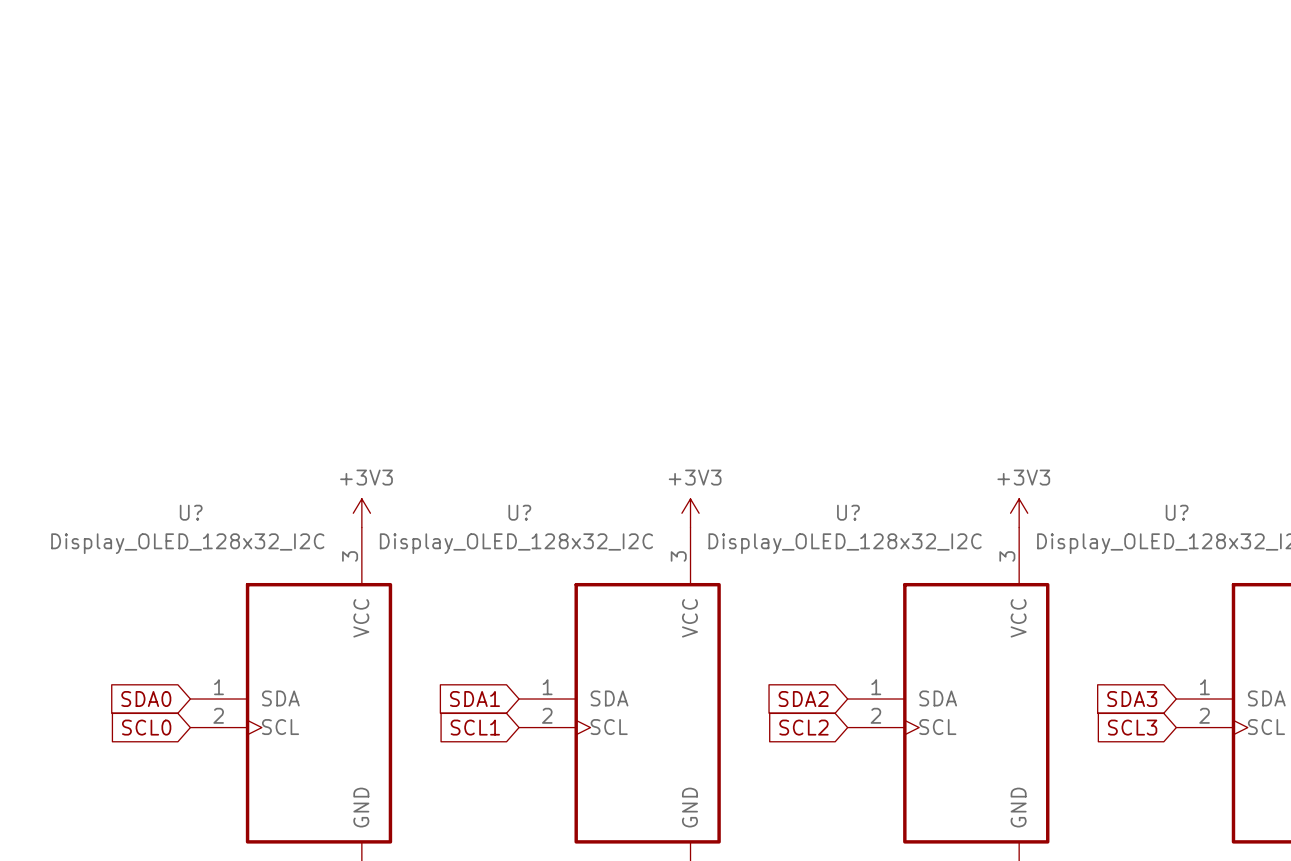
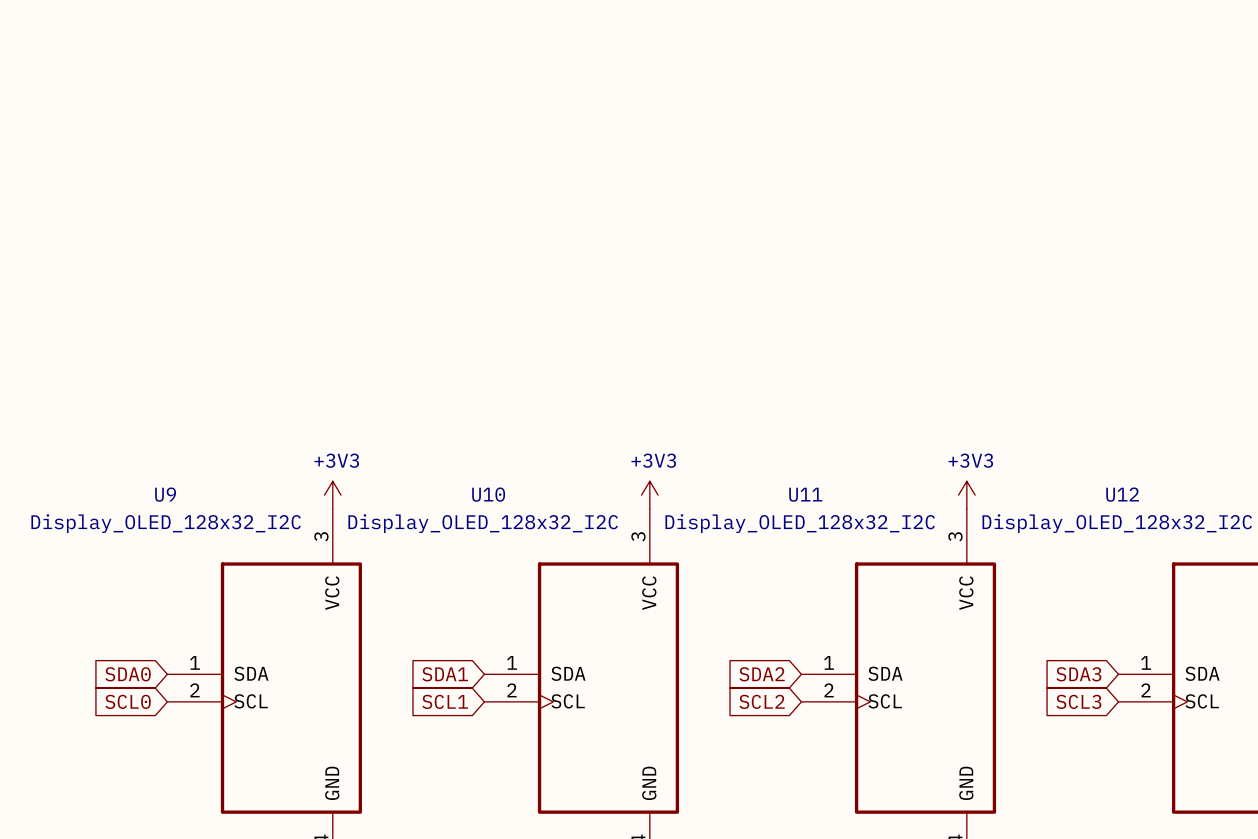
U? name: U? (191, 512) -> U9 (165, 494)
U? name: U? (519, 512) -> U10 (488, 494)
U? name: U? (848, 512) -> U11 (805, 494)
U? name: U? (1177, 512) -> U12 (1122, 494)

